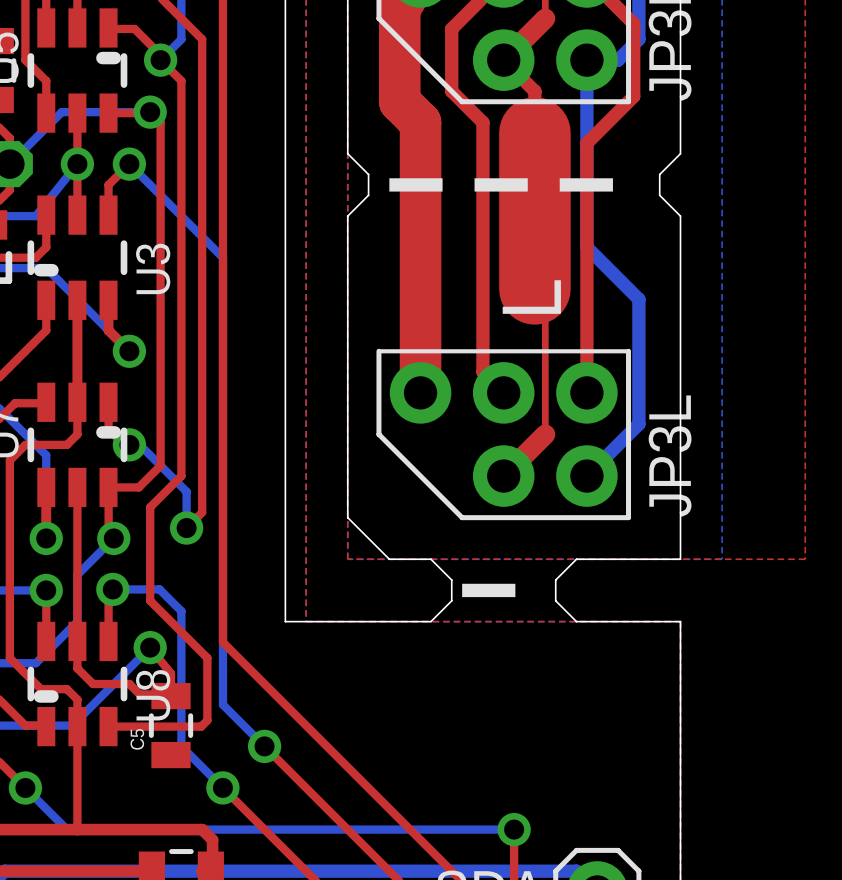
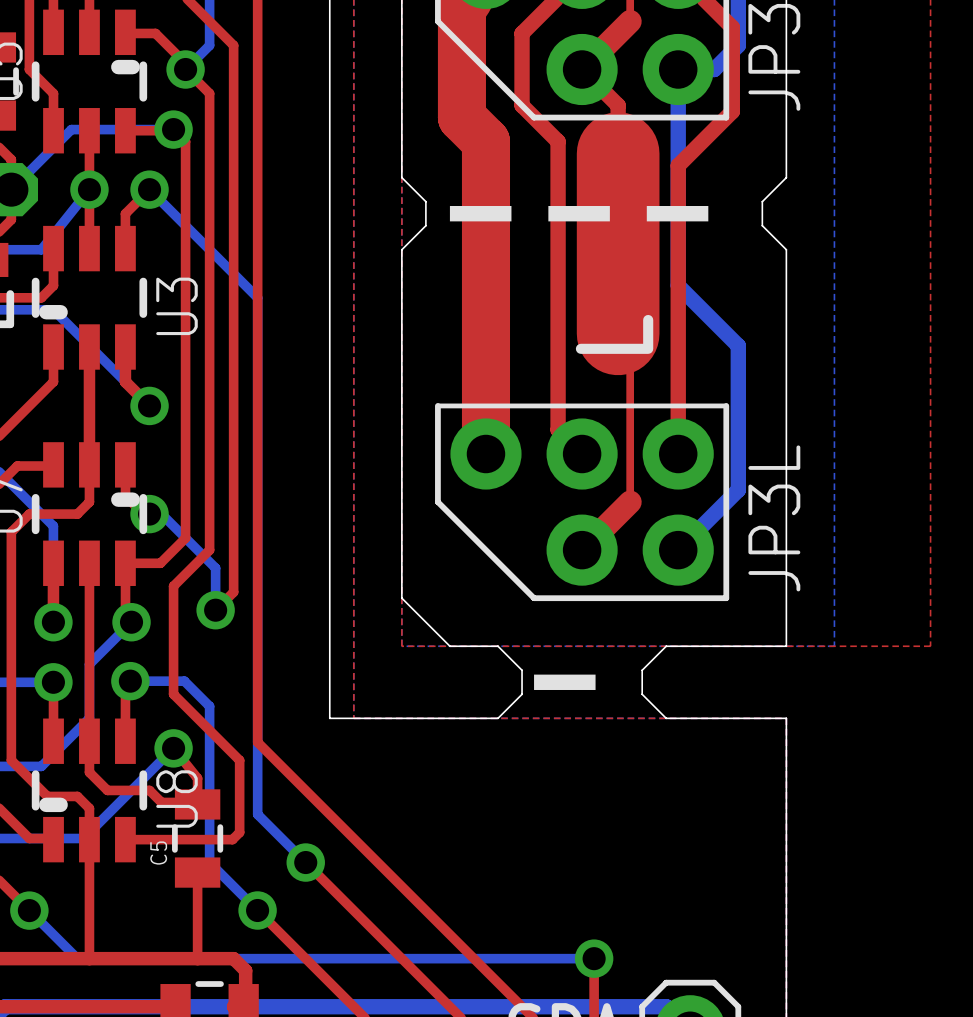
top track: none -> (197, 872) (197, 958)

